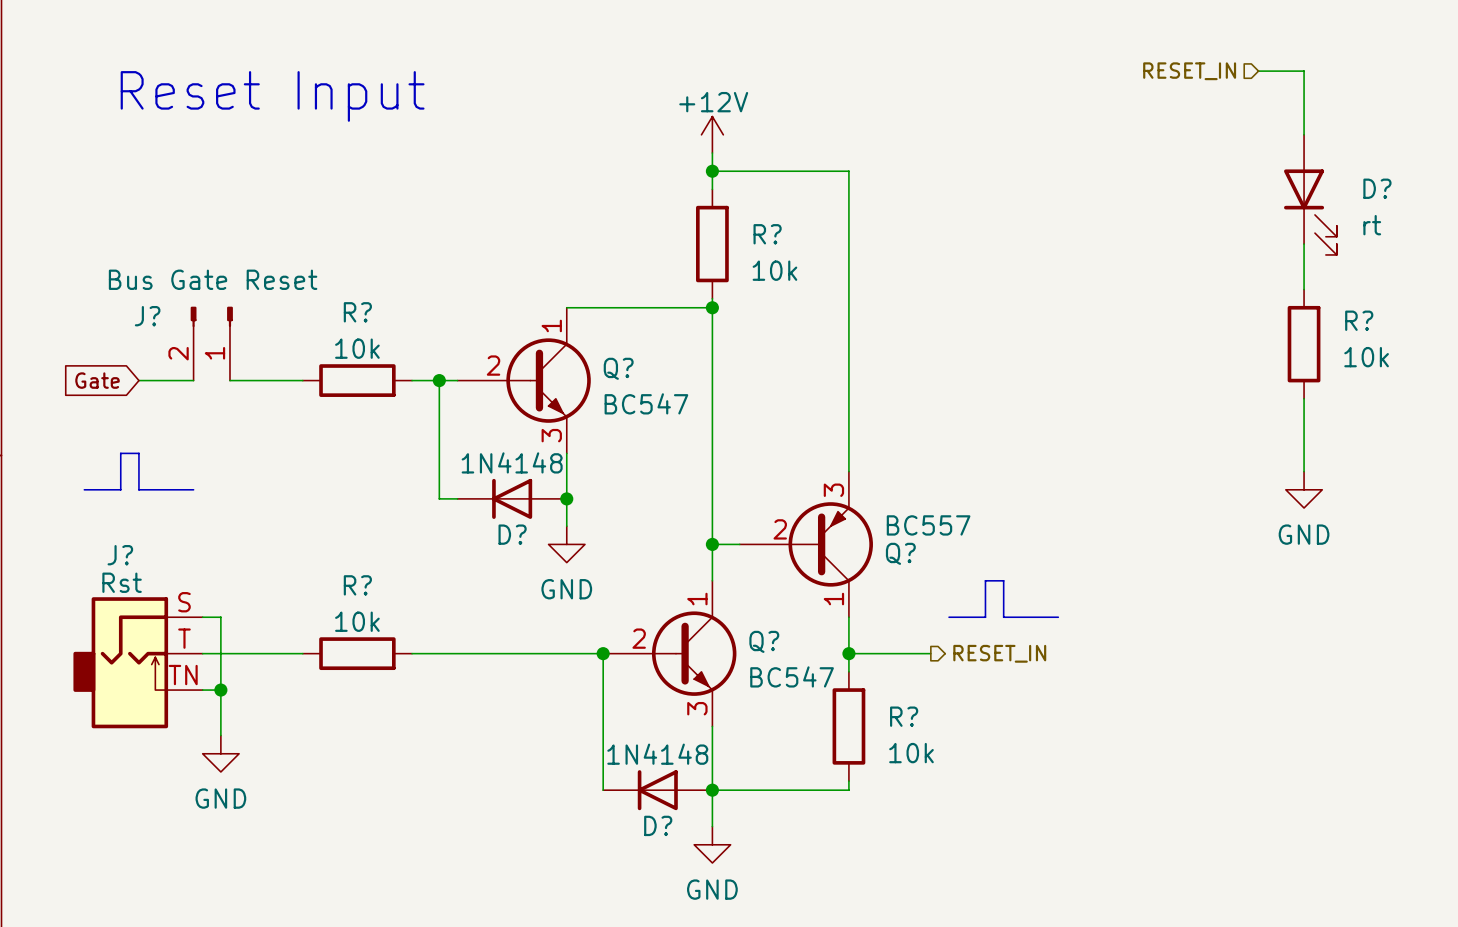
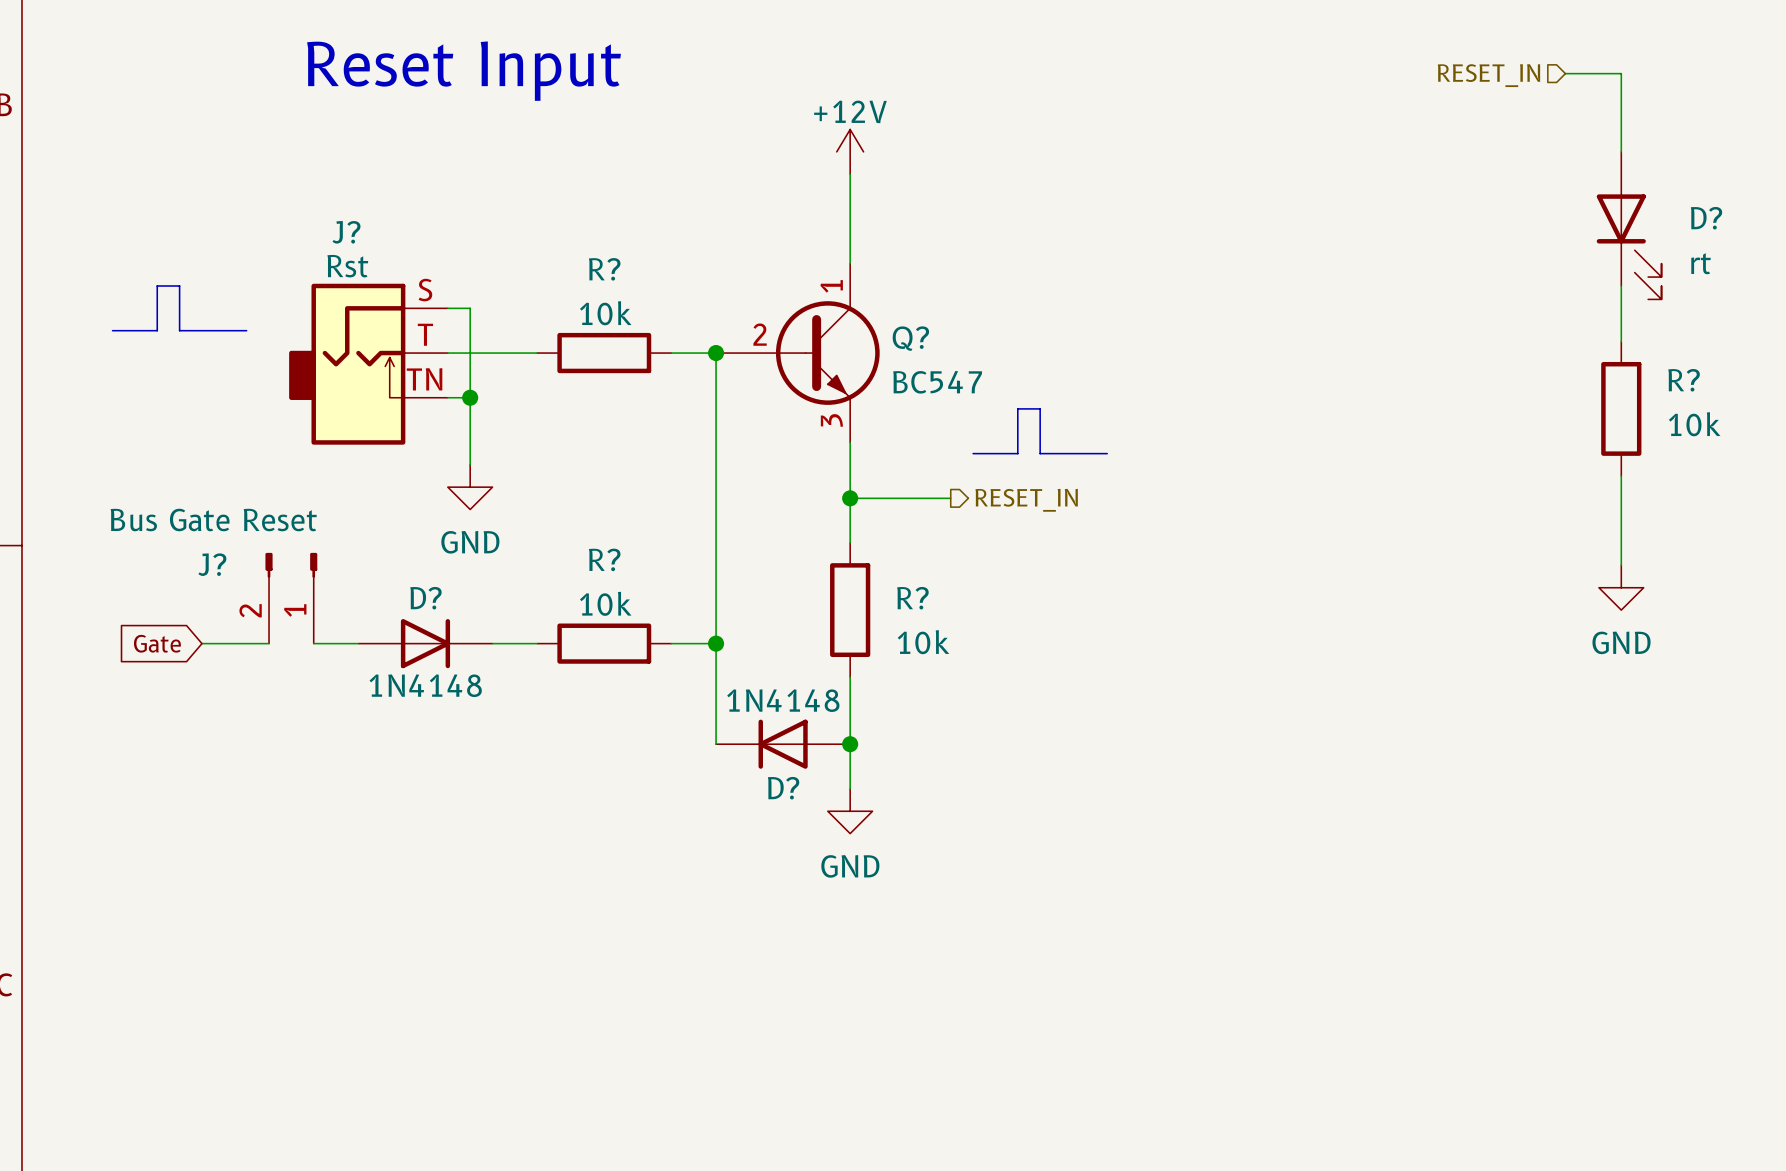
text position: Reset Input (272, 96) -> Reset Input (464, 71)
power symbol position: +12V (712, 134) -> +12V (850, 151)
wire: none -> (850, 174) (850, 263)
wire: (712, 153) (712, 189) -> none
wire: (712, 171) (848, 171) (848, 471) -> none
junction: (712, 171) -> none
R?: 10k (712, 244) -> none
wire: none -> (447, 308) (470, 308) (470, 464)
J? value position: Bus Gate Reset (213, 279) -> Bus Gate Reset (213, 519)
R?: none -> 10k (604, 353)
wire: none -> (671, 353) (716, 353) (716, 543)
junction: none -> (716, 353)
wire: (712, 298) (712, 580) -> none
J?: none -> Rst (368, 364)
wire: (566, 307) (712, 307) -> none
junction: (712, 307) -> none
wire: none -> (447, 397) (470, 397)
junction: none -> (470, 397)
J? position: (211, 343) -> (291, 598)
wire: none -> (850, 442) (850, 543)
global label position: Gate (97, 380) -> Gate (157, 643)
wire: (138, 380) (193, 380) -> (201, 643) (269, 643)
wire: (229, 380) (302, 380) -> (447, 353) (537, 353)
R?: 10k (357, 380) -> none
wire: (412, 380) (457, 380) -> none
wire: (439, 380) (439, 498) (457, 498) -> none
junction: (439, 380) -> none
Q? position: (524, 380) -> (797, 353)
power symbol: none -> GND (470, 487)
junction: none -> (850, 498)
line: (84, 489) (120, 489) (120, 453) (138, 453) (138, 489) (193, 489) -> (112, 330) (157, 330) (157, 285) (179, 285) (179, 330) (246, 330)
D?: 1N4148 (512, 498) -> none
junction position: (566, 498) -> (716, 643)
R?: none -> 10k (850, 610)
wire: none -> (716, 632) (716, 744)
wire: none -> (313, 643) (358, 643)
D?: none -> 1N4148 (425, 643)
wire: none -> (492, 643) (537, 643)
R?: none -> 10k (604, 643)
wire: none -> (671, 643) (716, 643)
power symbol: GND (566, 544) -> none
wire: (712, 544) (739, 544) -> none
junction: (712, 544) -> none
Q?: BC557 (806, 544) -> none
wire: none -> (850, 677) (850, 788)
wire: (202, 617) (220, 617) (220, 735) -> none
D?: none -> 1N4148 (783, 744)
junction: none -> (850, 744)
wire: (848, 617) (848, 671) -> none
line: (949, 617) (985, 617) (985, 580) (1003, 580) (1003, 617) (1058, 617) -> (973, 453) (1017, 453) (1017, 408) (1040, 408) (1040, 453) (1107, 453)
wire: (202, 653) (302, 653) -> none
R?: 10k (357, 653) -> none
wire: (412, 653) (603, 653) (603, 790) -> none
junction: (603, 653) -> none
Q?: BC547 (669, 653) -> none
wire: (848, 653) (930, 653) -> (850, 498) (950, 498)
junction: (848, 653) -> none
hierarchical label position: RESET_IN (999, 653) -> RESET_IN (1026, 500)
J?: Rst (138, 662) -> none
power symbol: none -> GND (850, 811)
wire: (202, 690) (220, 690) -> none
junction: (220, 690) -> none
wire: (712, 726) (712, 826) -> none
R?: 10k (848, 726) -> none
power symbol: GND (220, 753) -> none
wire: (848, 781) (848, 790) (712, 790) -> none
D?: 1N4148 (657, 790) -> none
junction: (712, 790) -> none
power symbol: GND (712, 844) -> none

